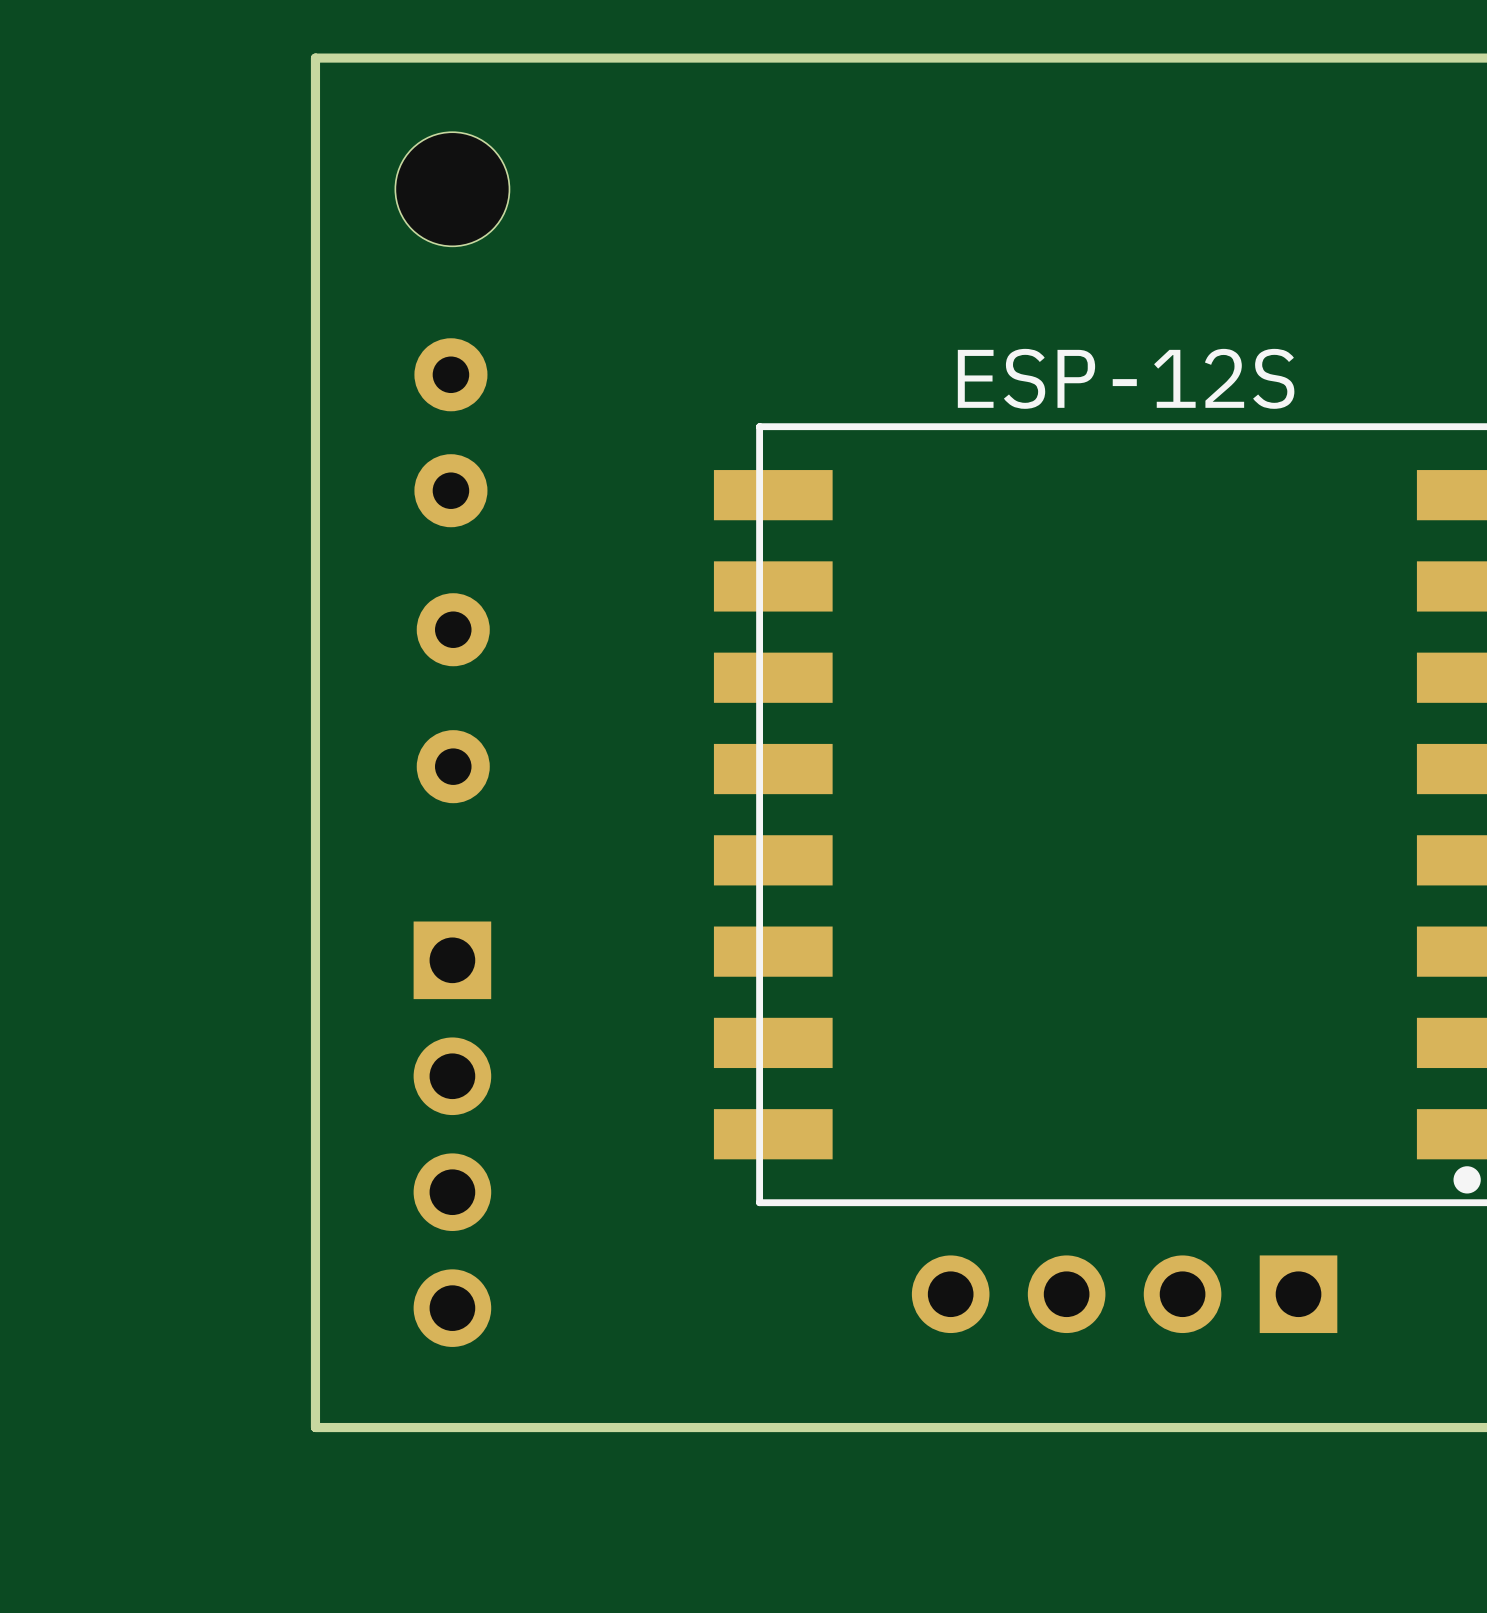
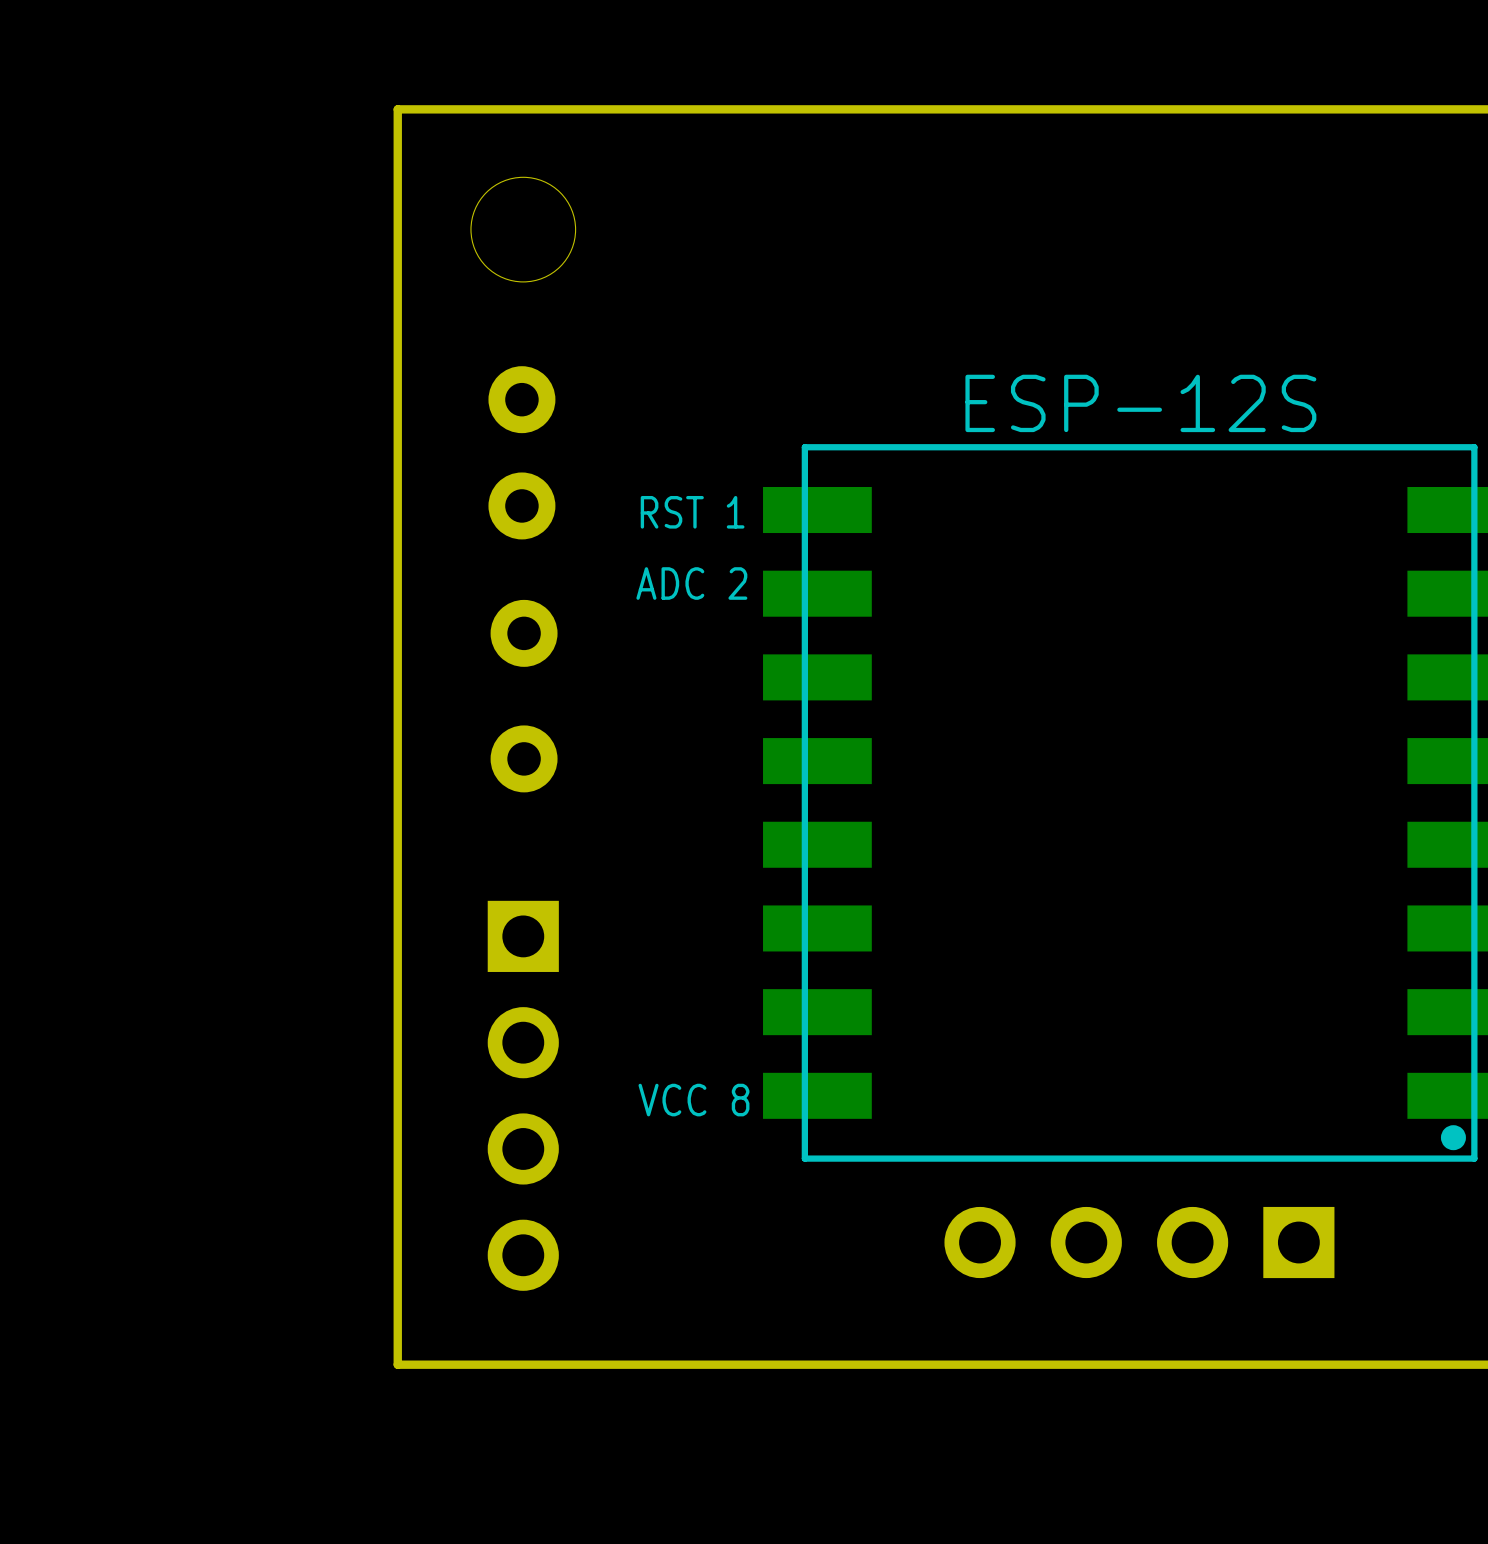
text: none -> RST 1 (692, 512)
text: none -> ADC 2 (691, 583)
text: none -> VCC 8 (693, 1100)

